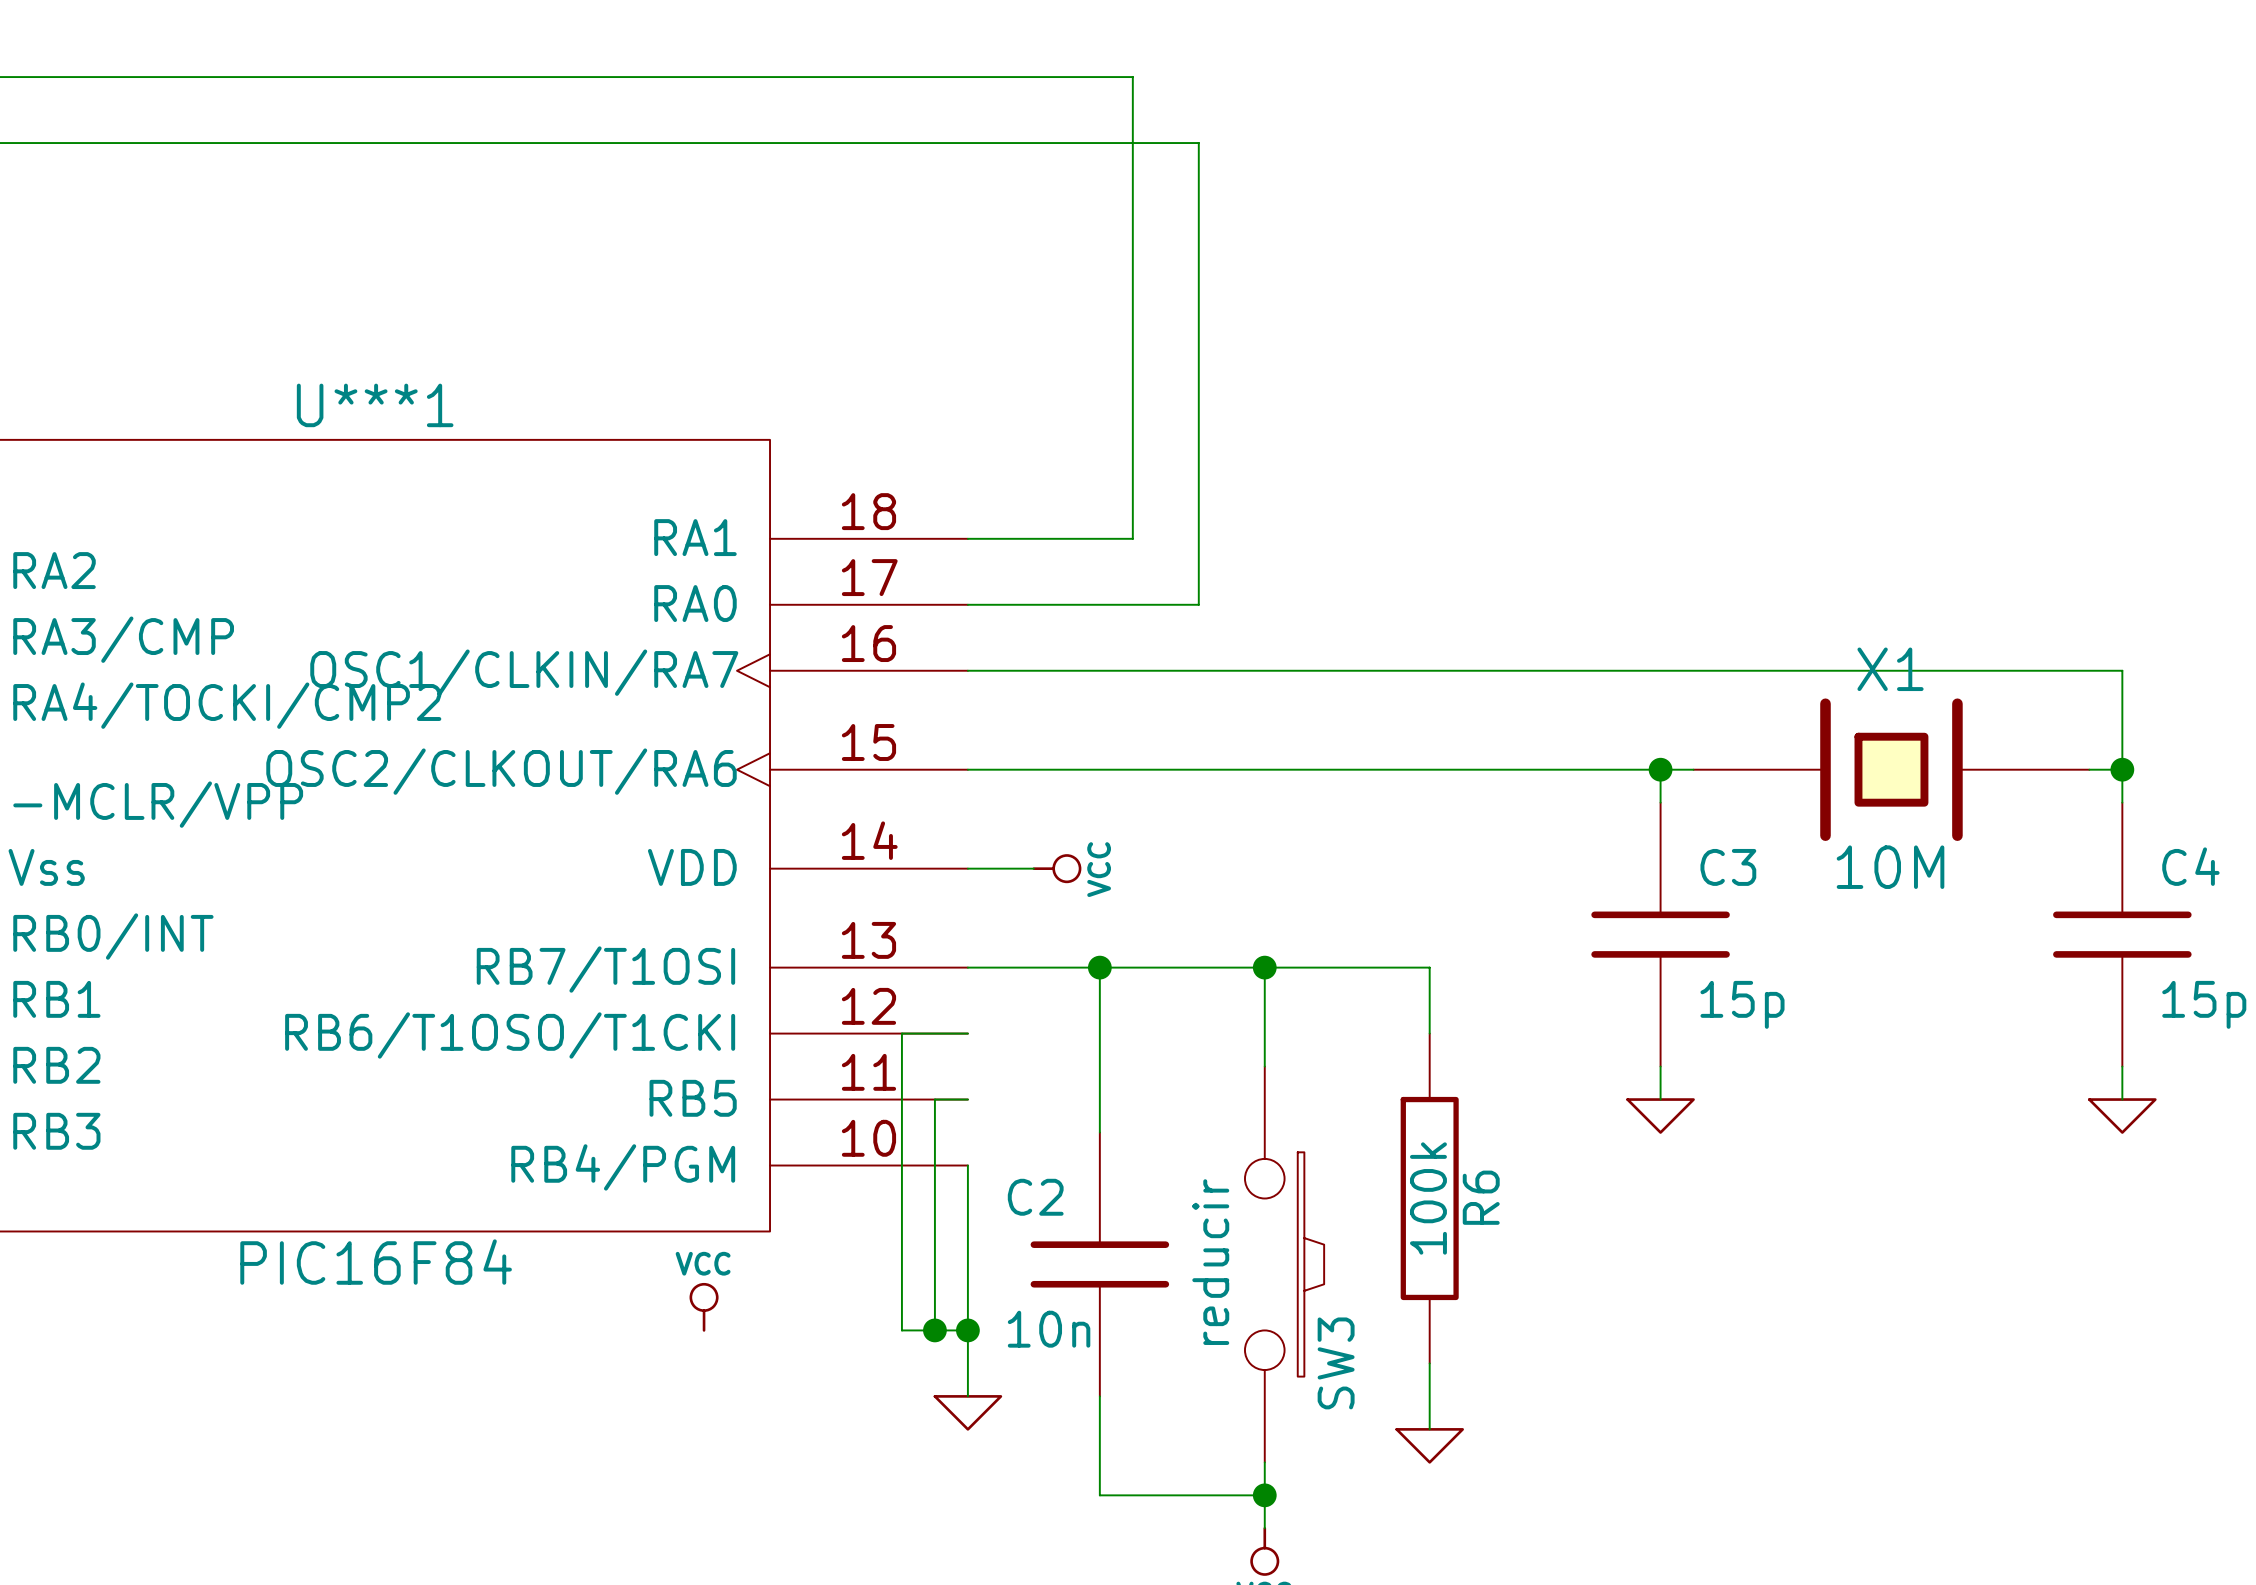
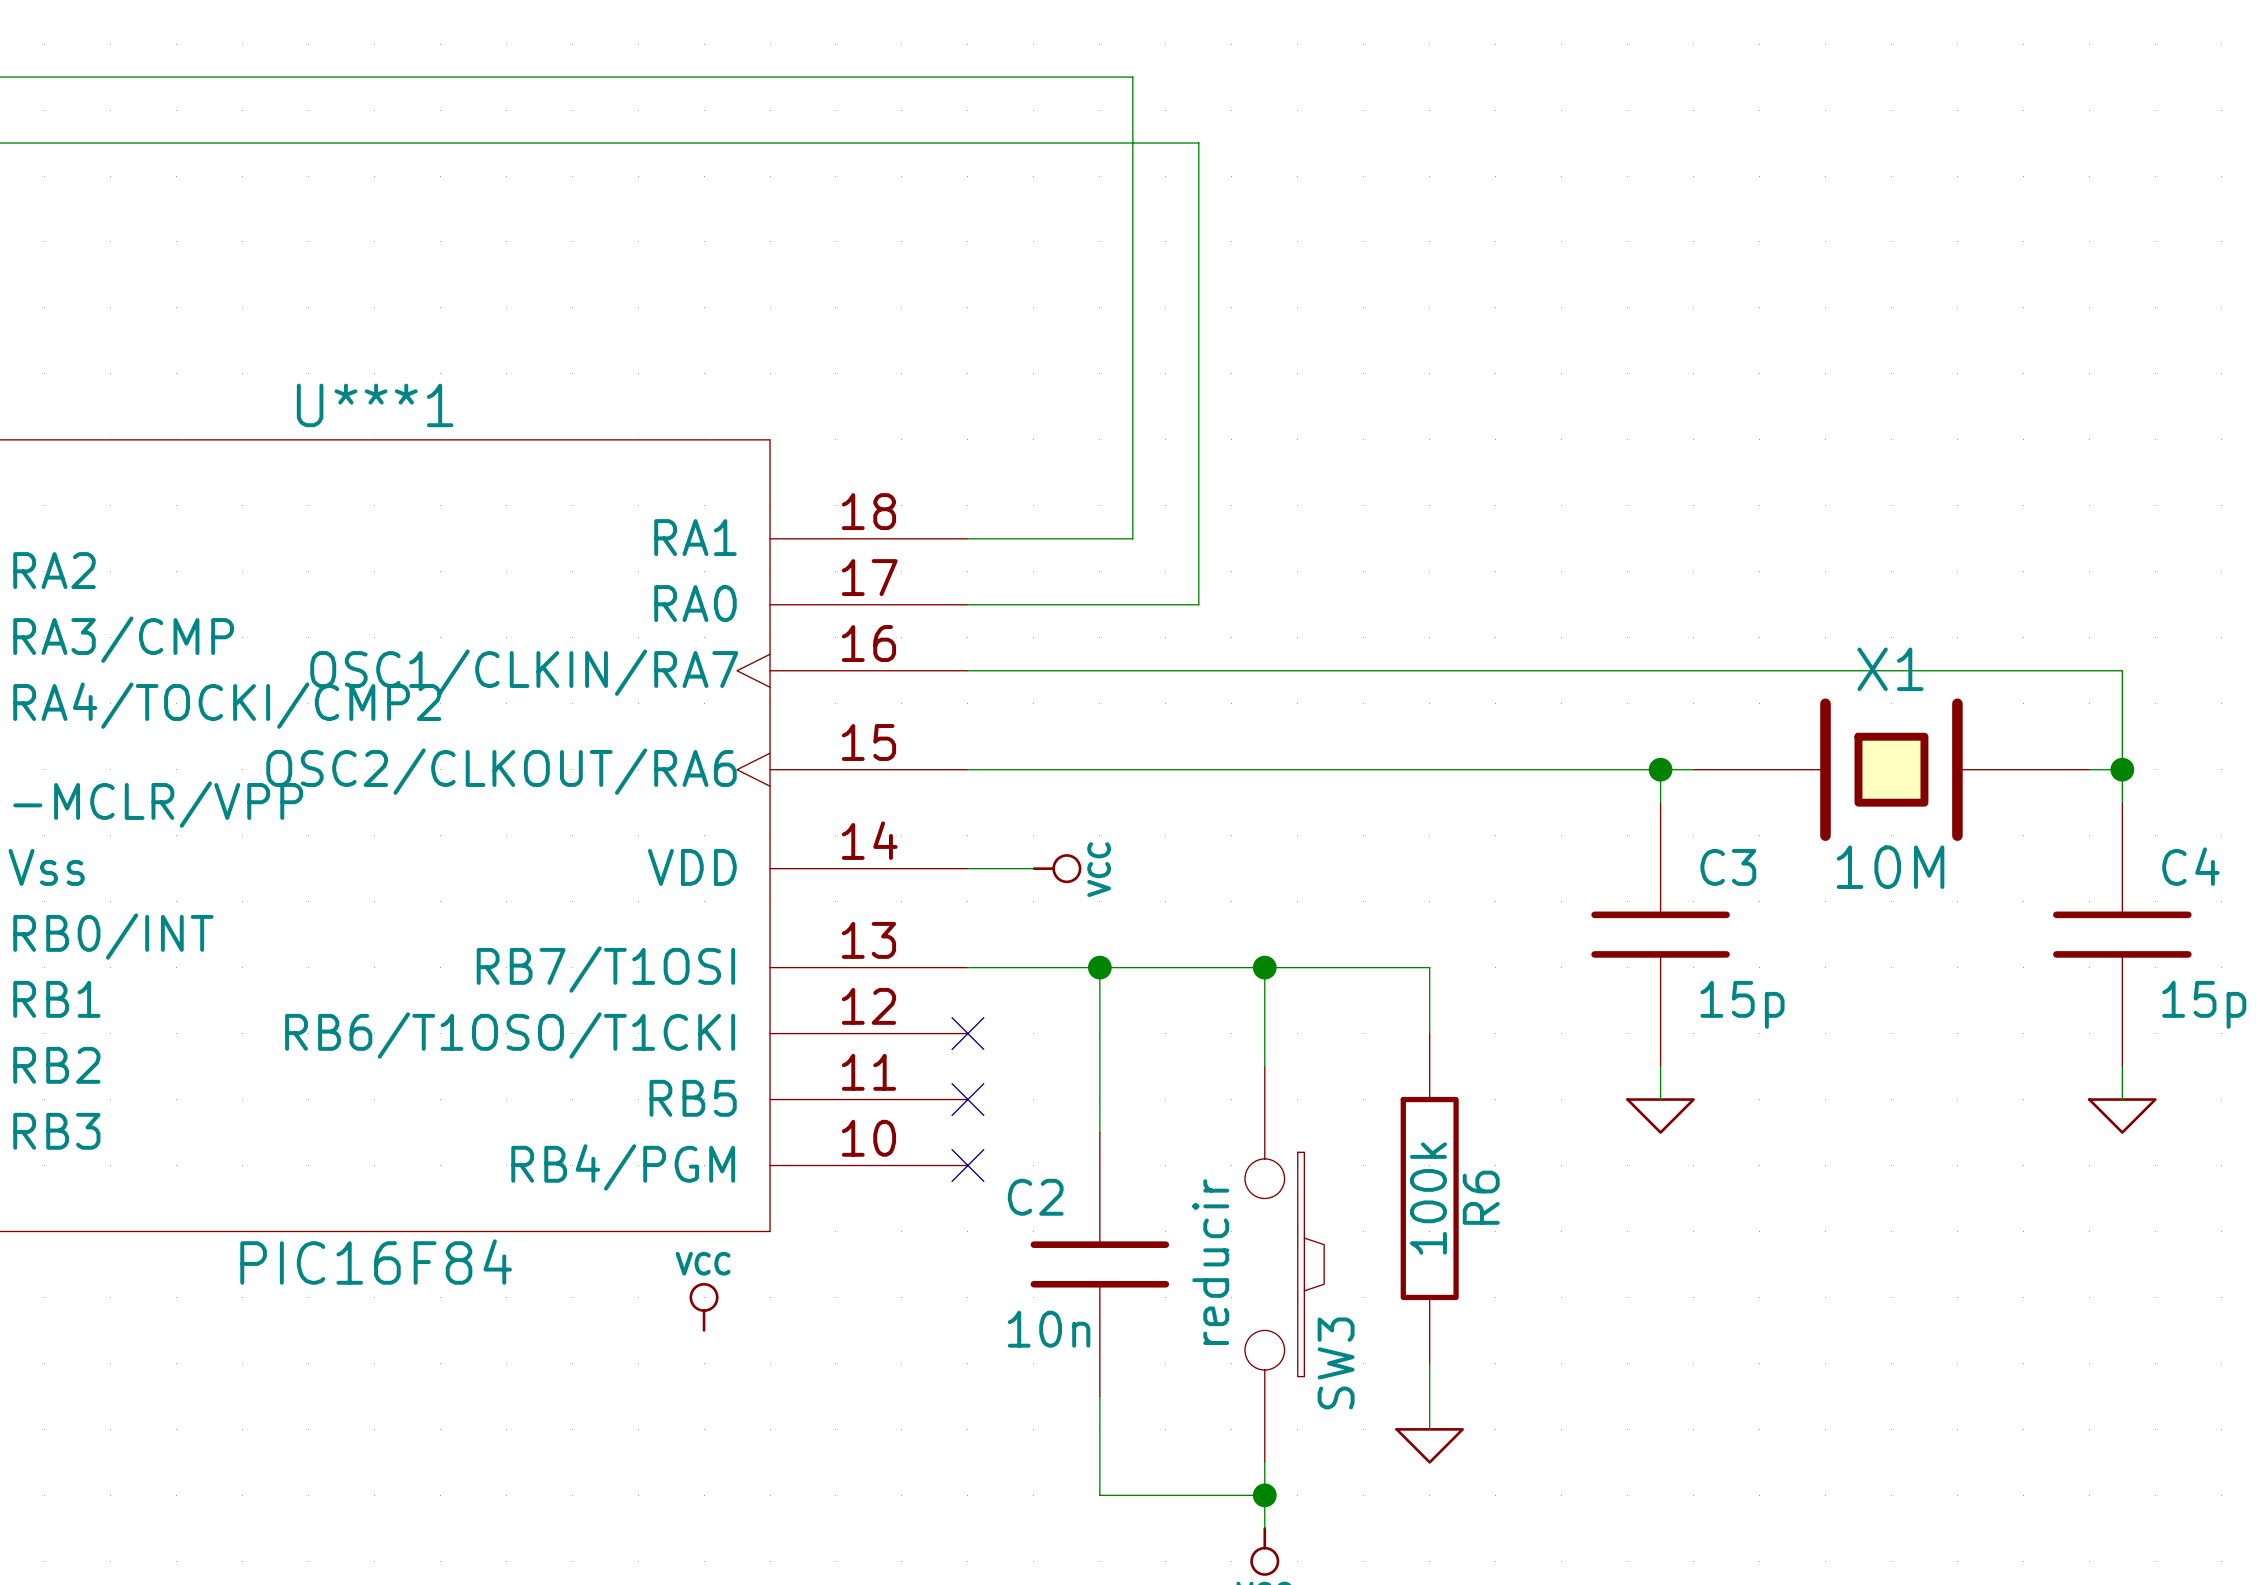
wire: (967, 1033) (901, 1033) (901, 1330) (967, 1330) -> none
no-connect mark: none -> (967, 1033)
wire: (967, 1099) (934, 1099) (934, 1330) -> none
no-connect mark: none -> (967, 1099)
wire: (967, 1165) (967, 1396) -> none
no-connect mark: none -> (967, 1165)
junction: (934, 1330) -> none
junction: (967, 1330) -> none
power symbol: (967, 1412) -> none

